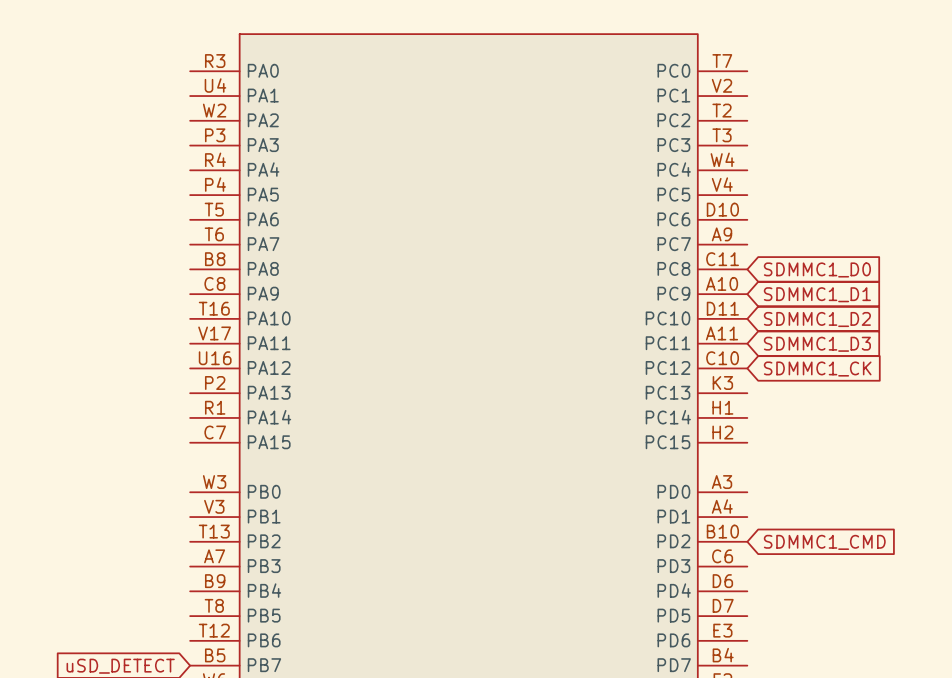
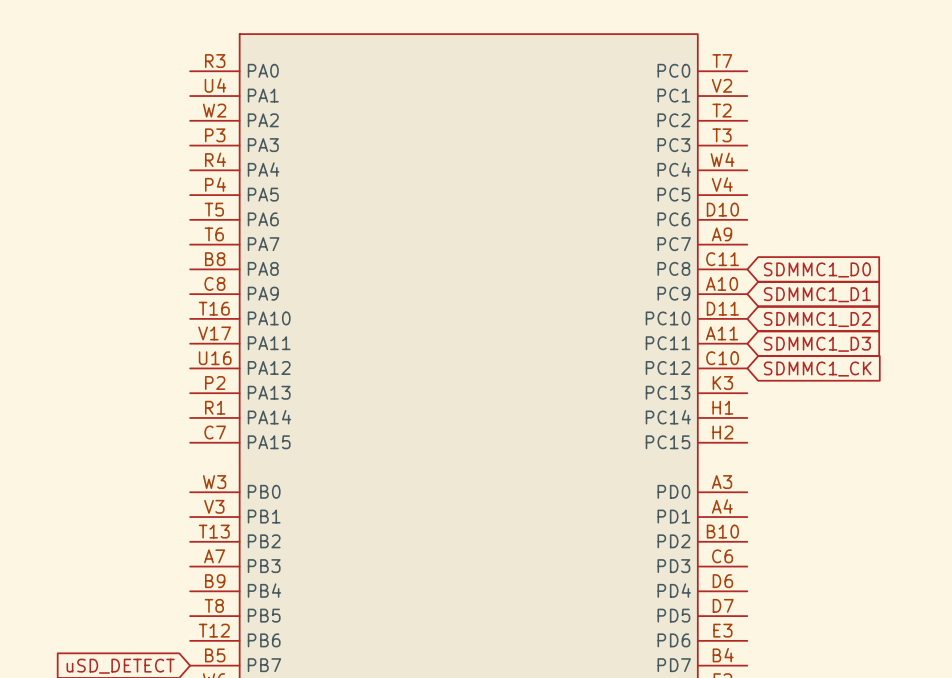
global label: SDMMC1_CMD (824, 542) -> none

